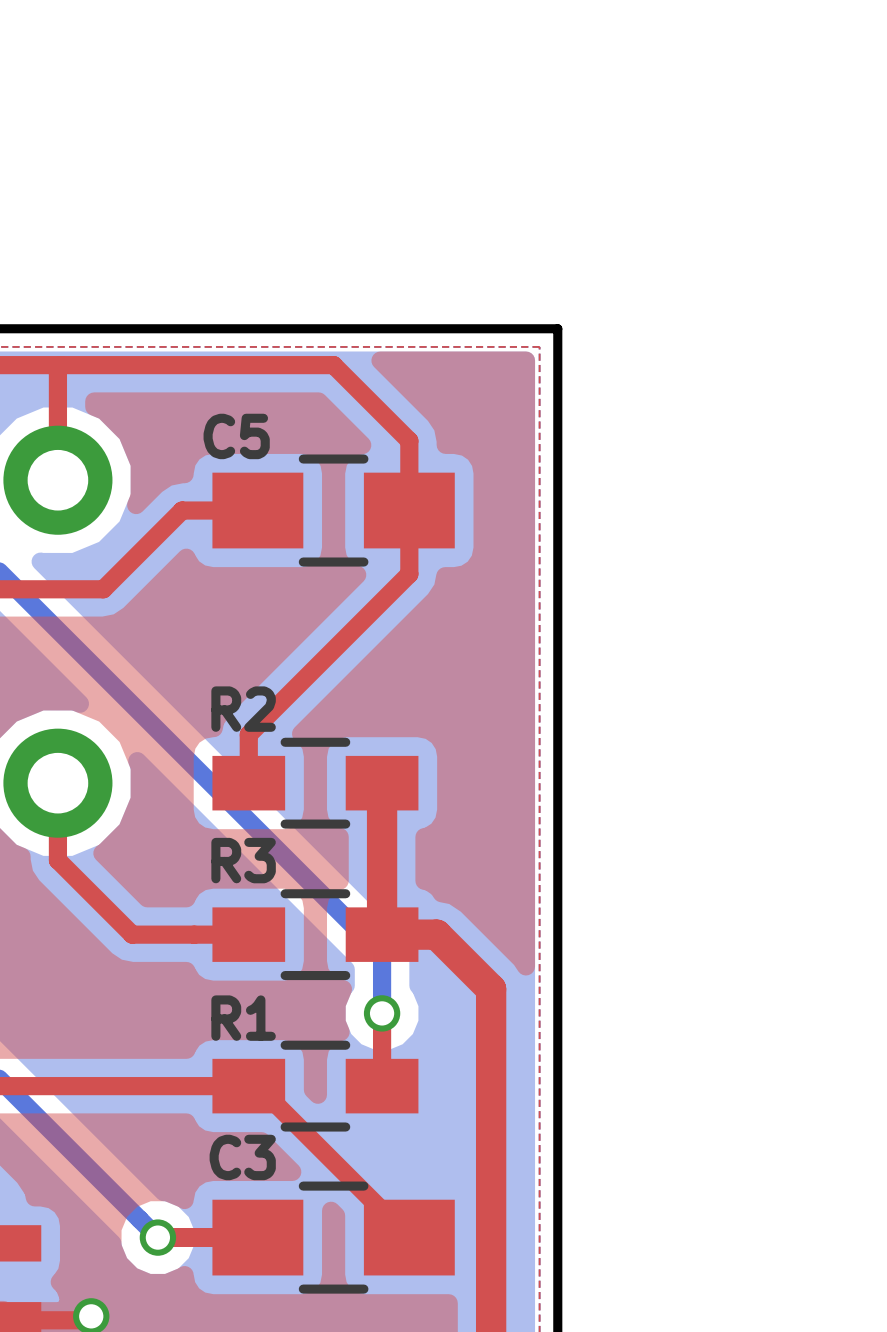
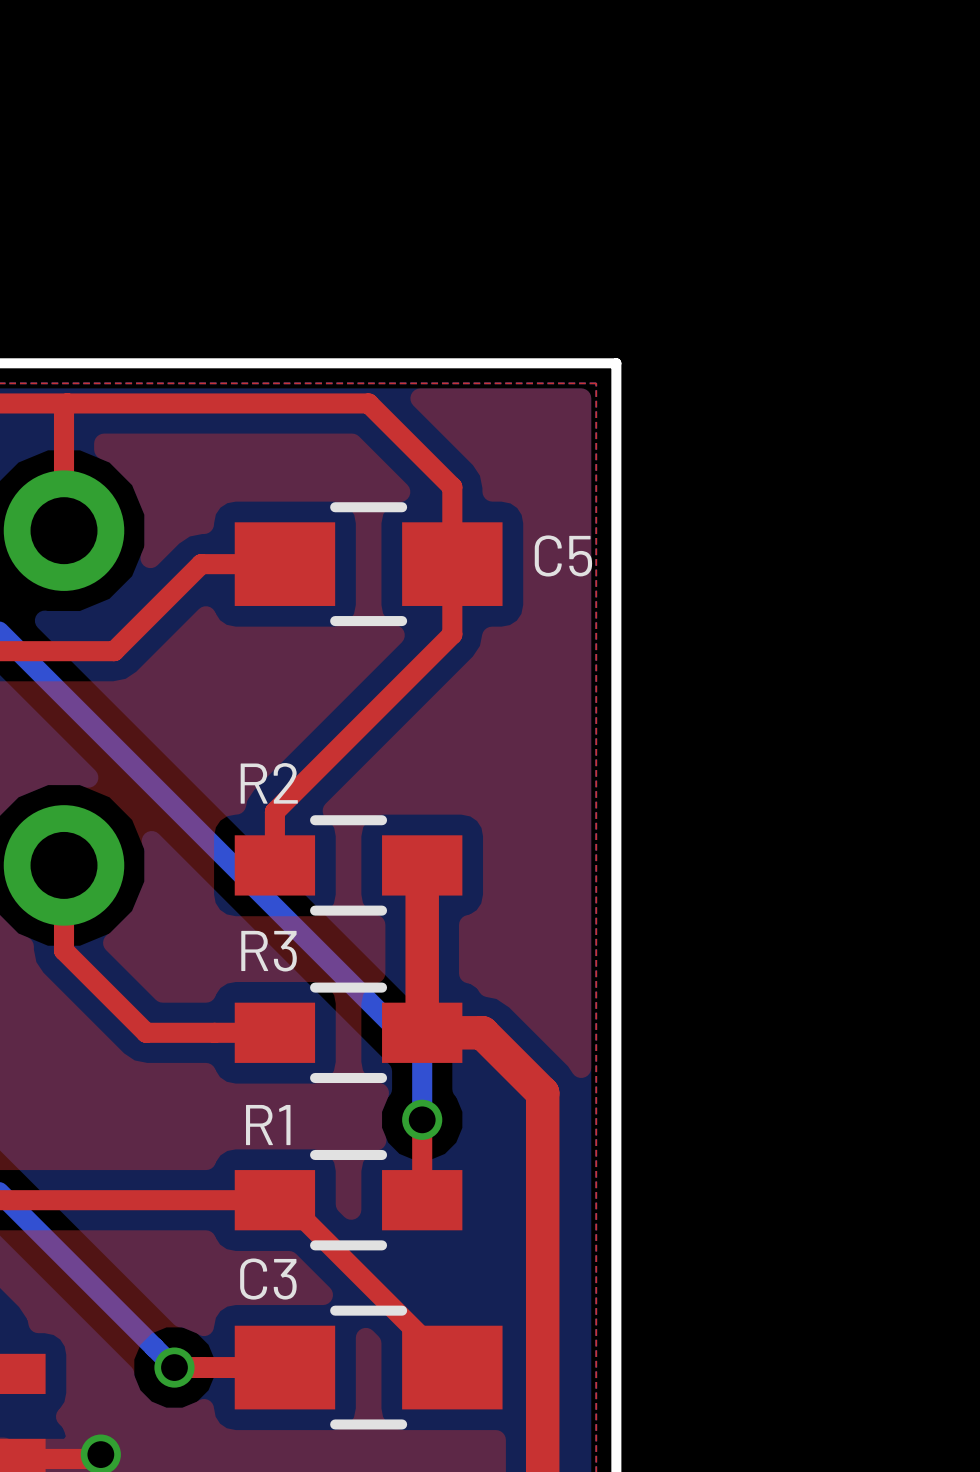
C5 name position: C5 (236, 436) -> C5 (563, 555)

